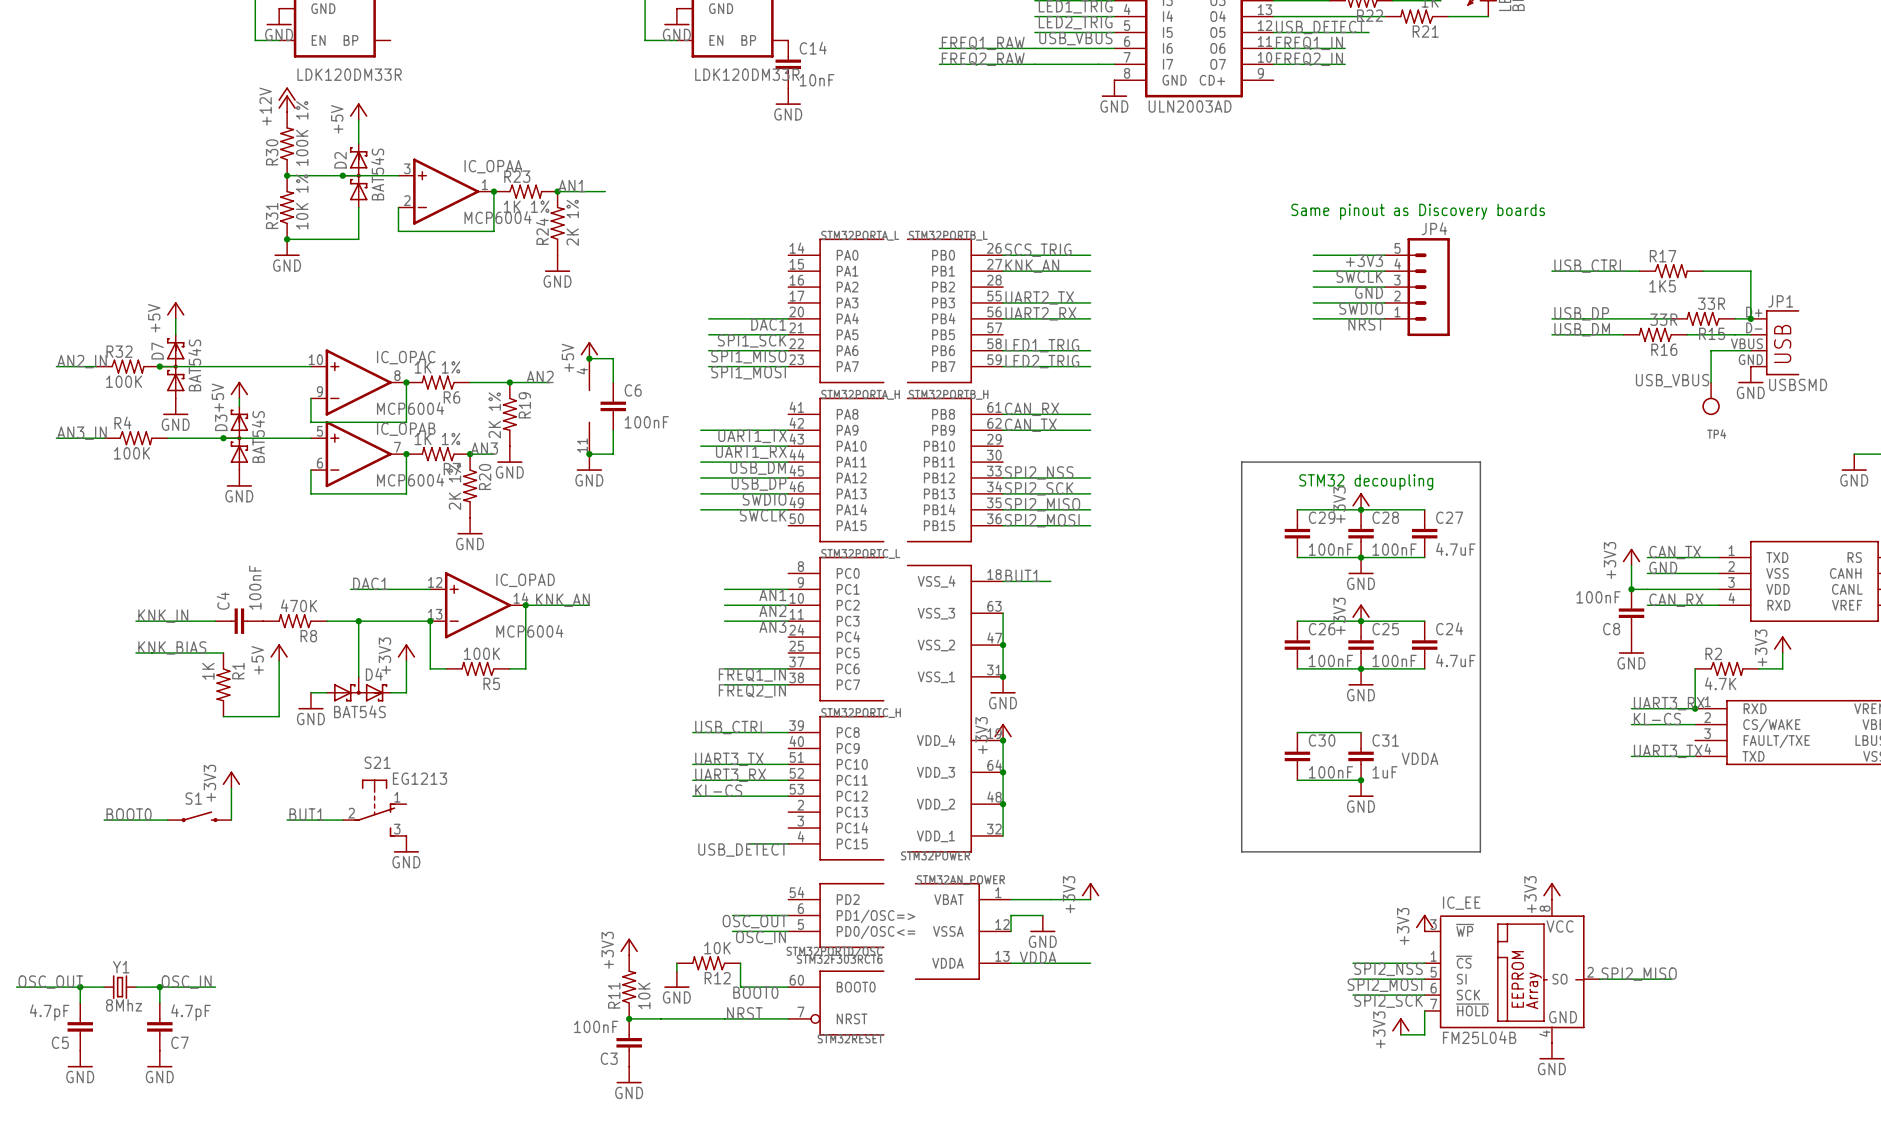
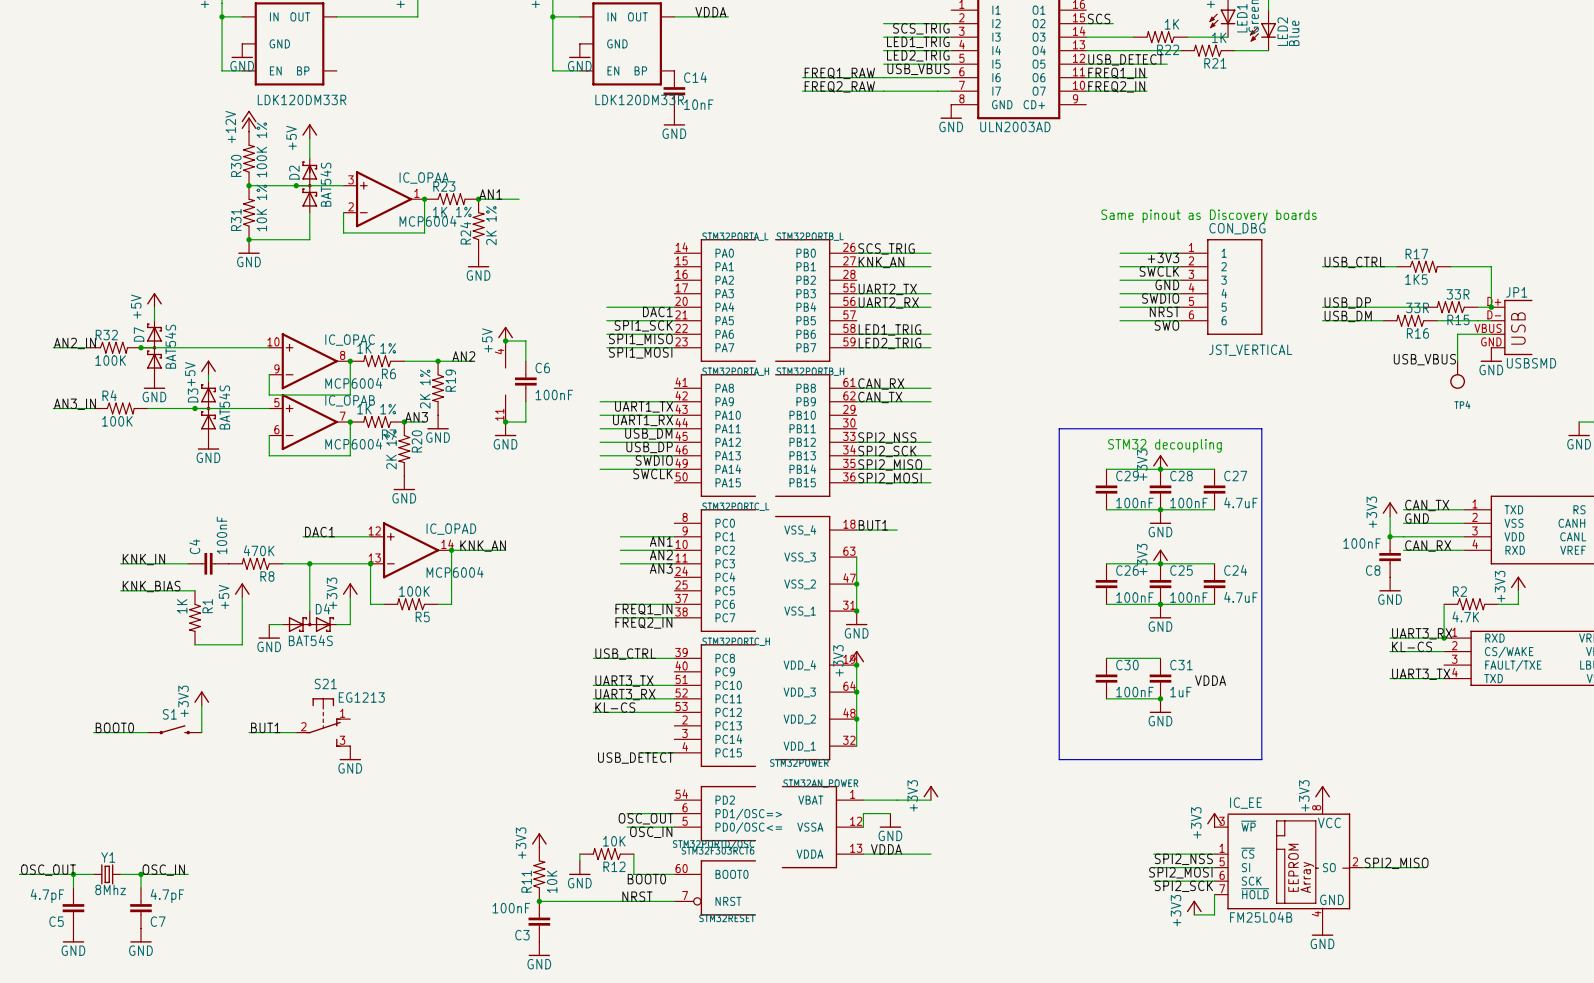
JP4: (1417, 287) -> none
CON_DBG: none -> JST_VERTICAL (1221, 286)
wire: none -> (1120, 320) (1180, 320)
label: none -> SWO (1166, 325)

